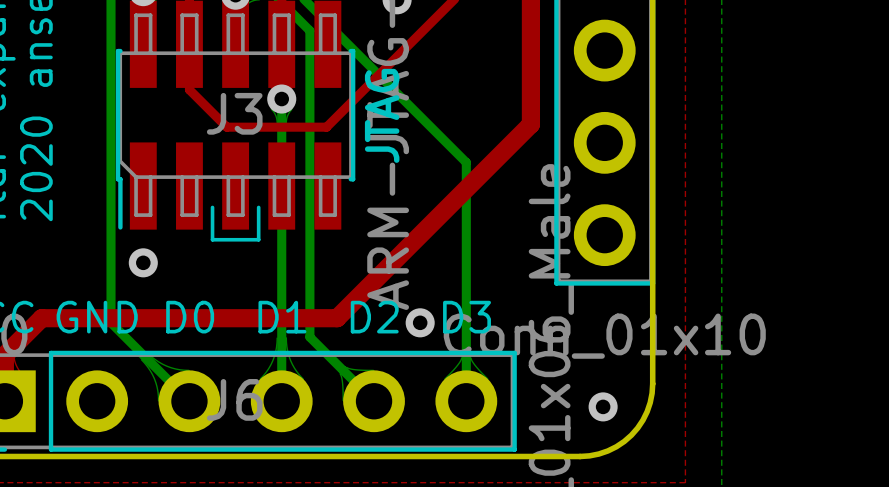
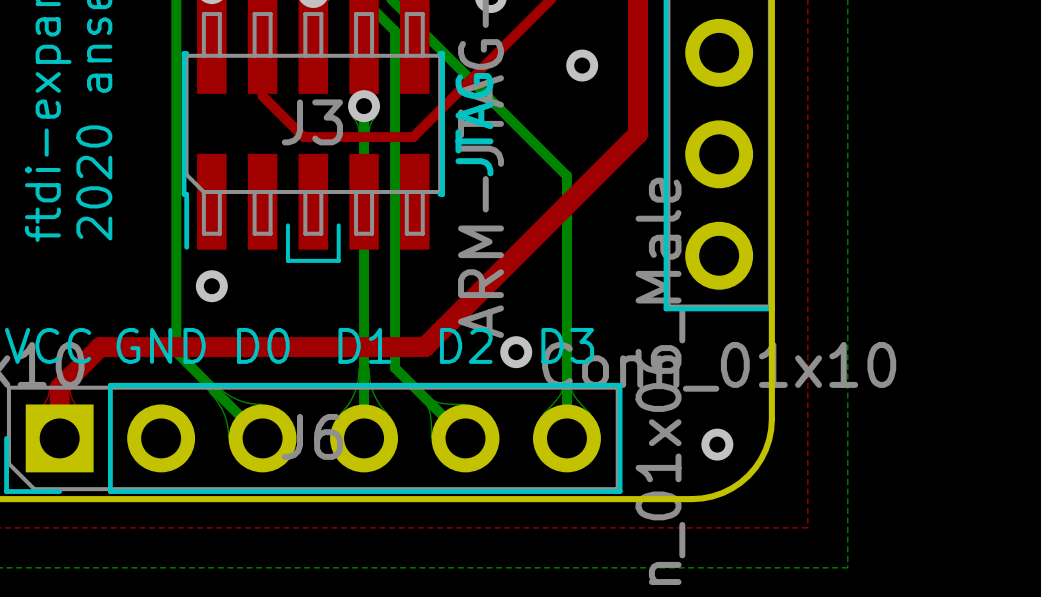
via: none -> (582, 65)

